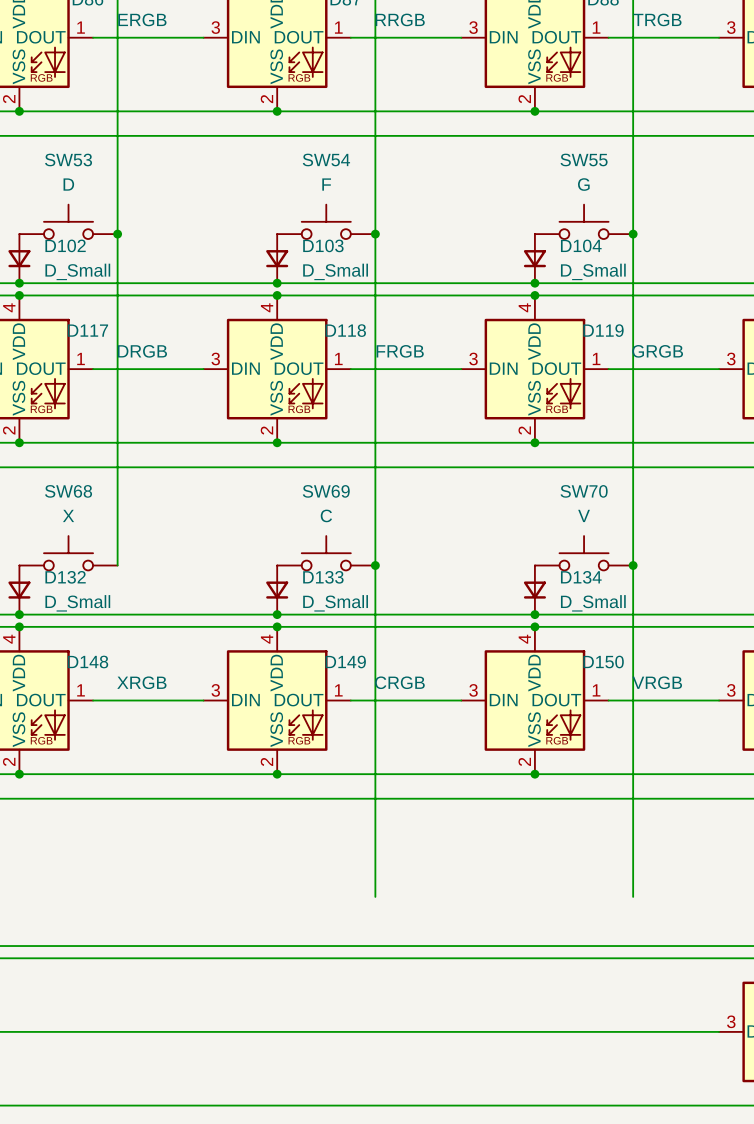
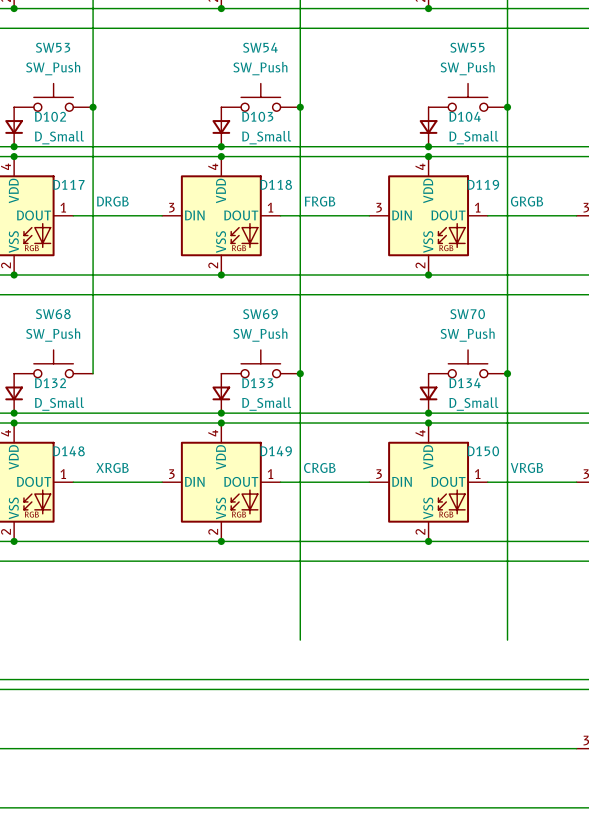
SW53 value: D (68, 184) -> SW_Push (53, 68)
SW54 value: F (326, 184) -> SW_Push (260, 68)
SW55 value: G (583, 184) -> SW_Push (467, 68)
SW68 value: X (68, 515) -> SW_Push (53, 334)
SW69 value: C (326, 515) -> SW_Push (260, 334)
SW70 value: V (584, 515) -> SW_Push (467, 334)

